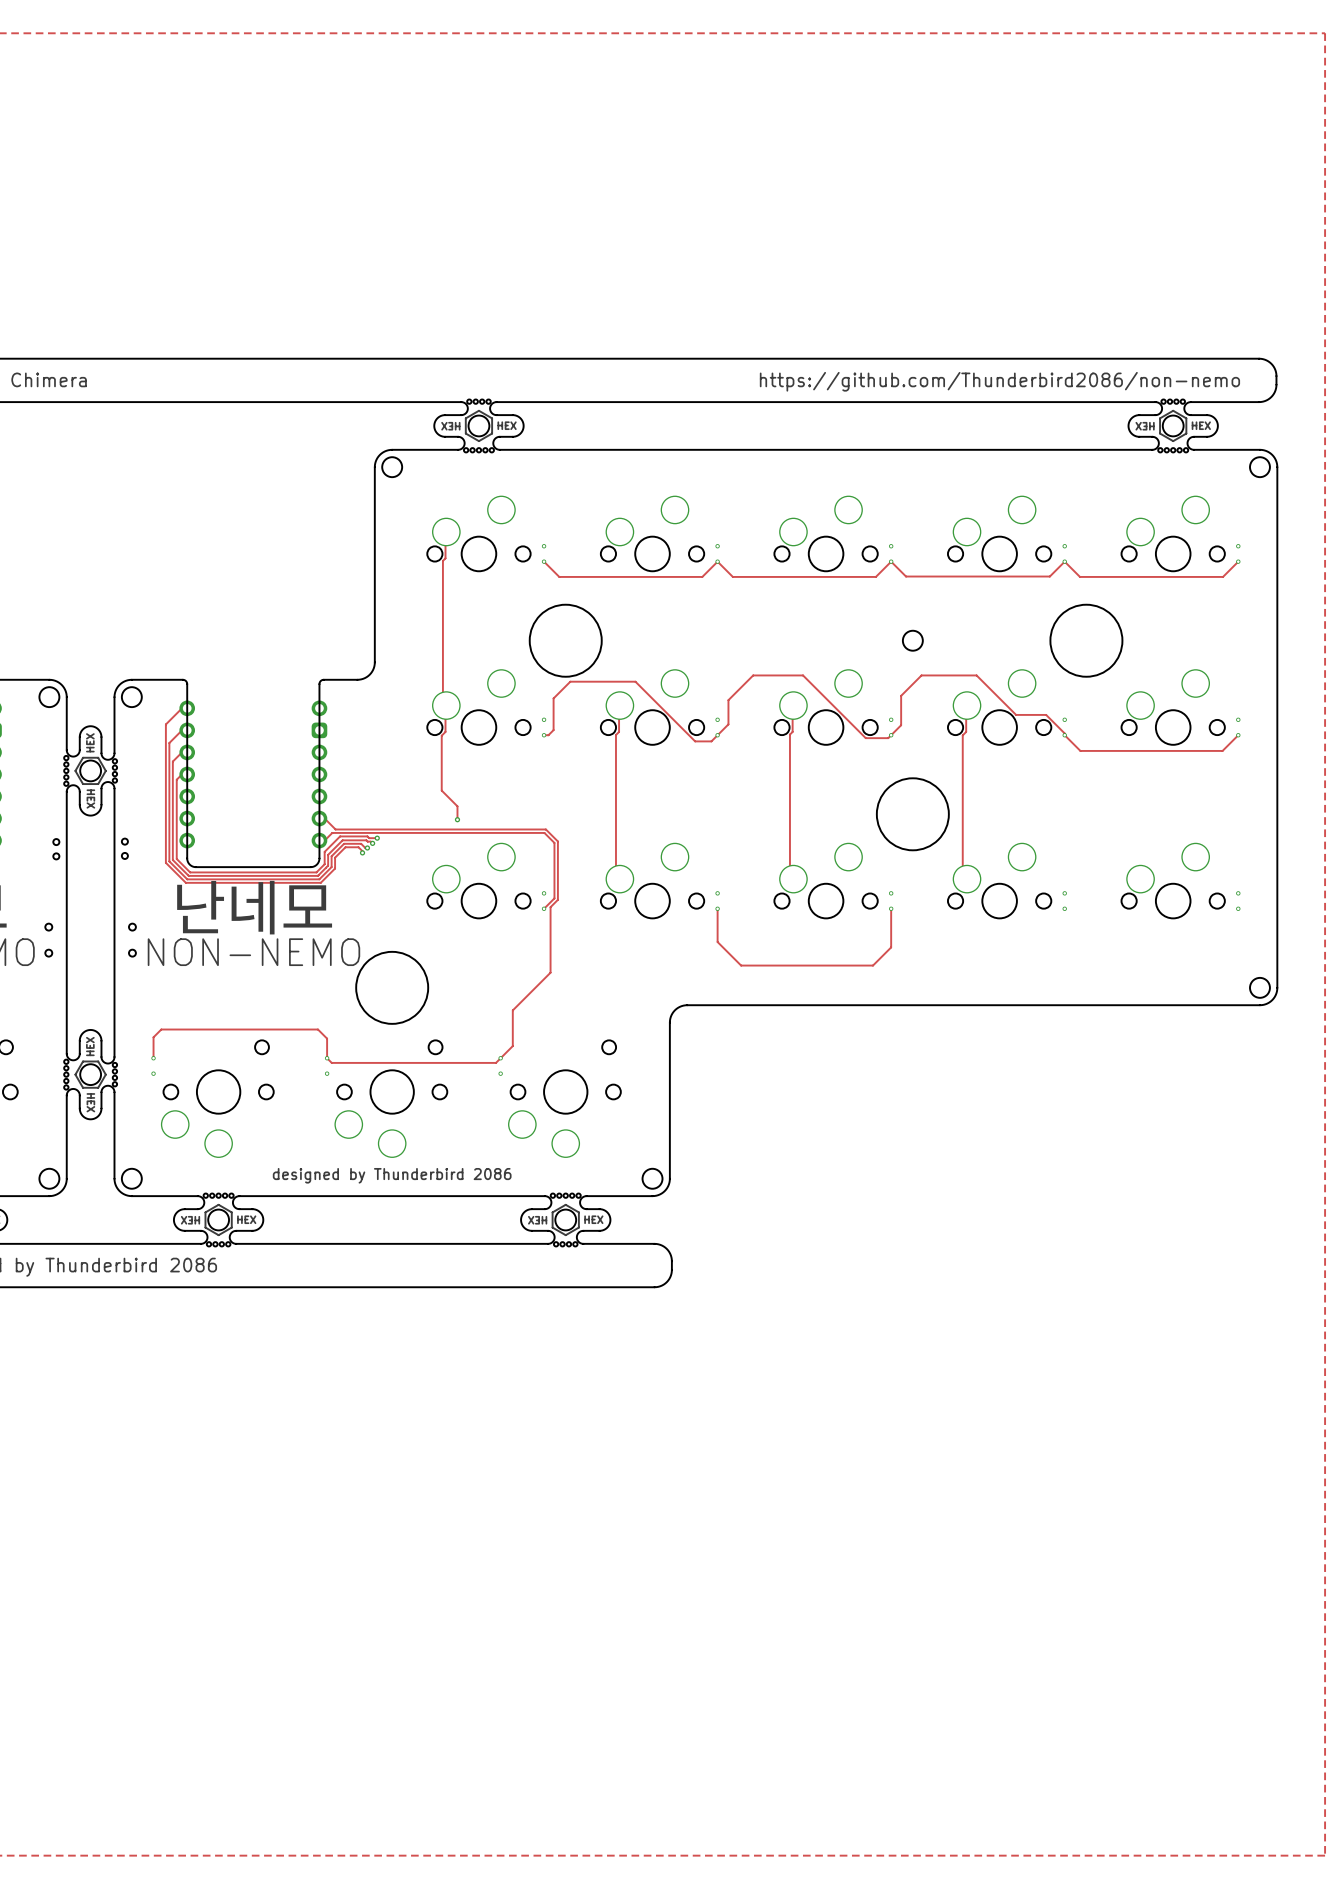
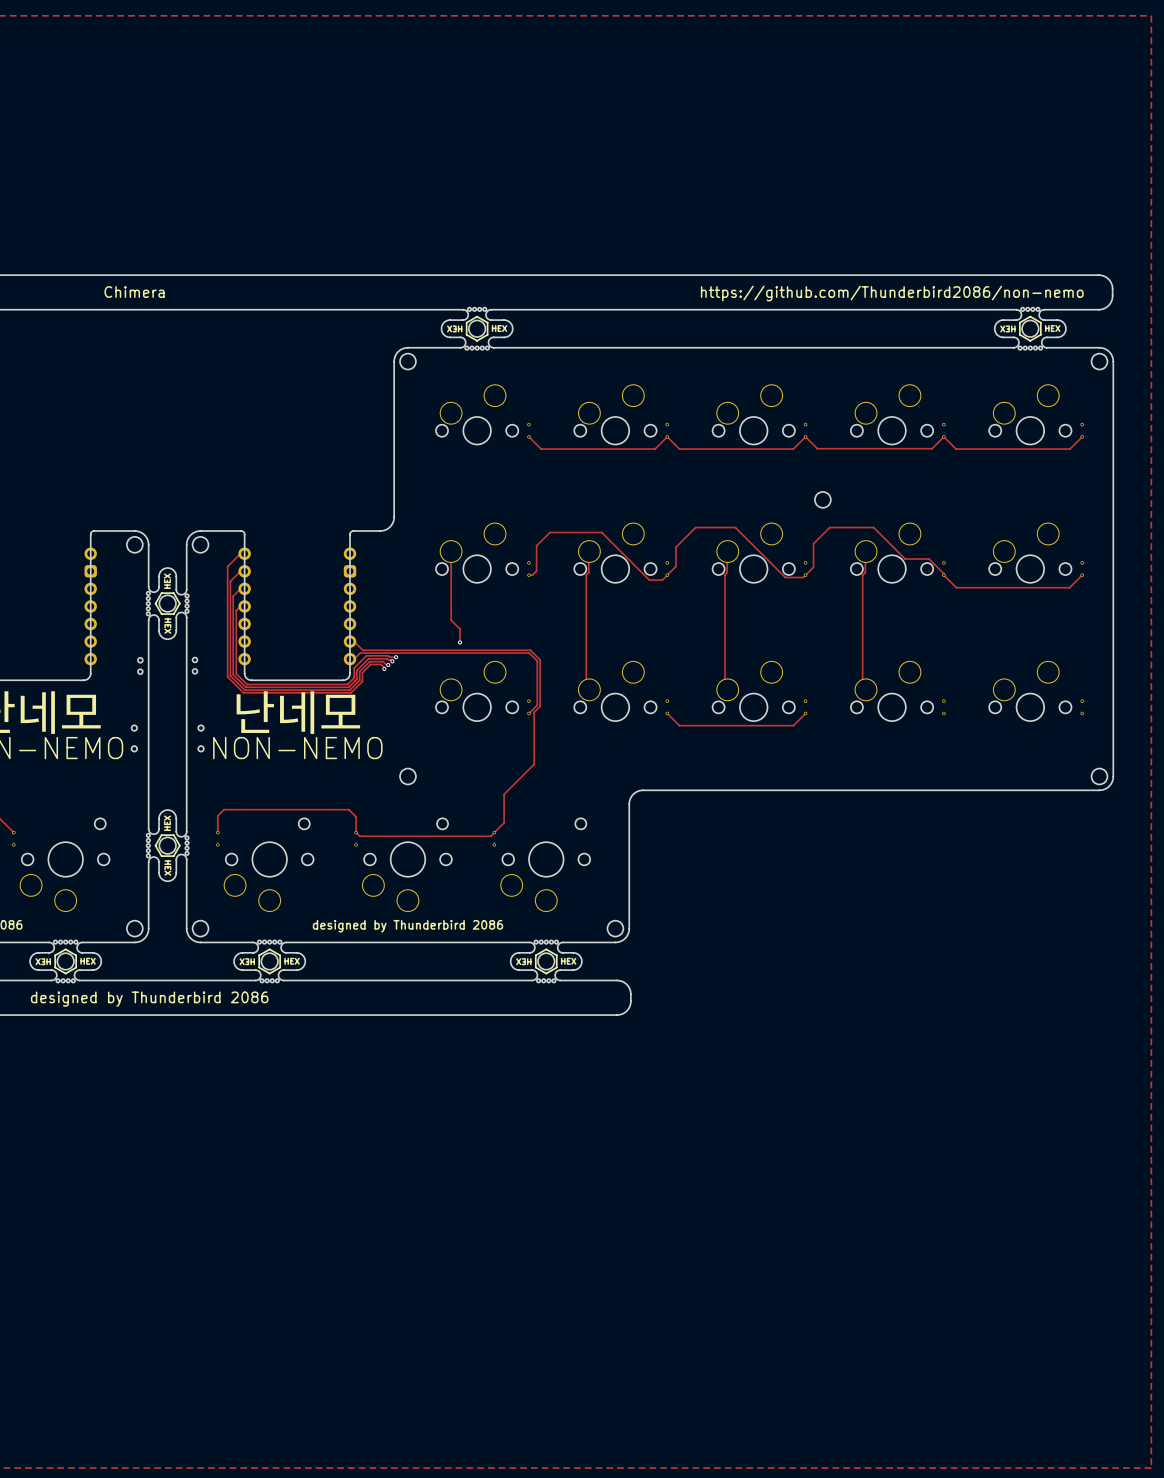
track: (446, 532) (445, 558) (442, 560) (442, 702) (446, 705) (445, 731) (441, 735) (441, 790) (457, 806) -> (451, 551) (451, 620) (460, 629) (460, 631)
round board edge: [529, 604, 603, 678] -> none
round board edge: [1049, 604, 1124, 678] -> none
round board edge: [876, 777, 950, 851] -> none
track: (717, 908) (717, 942) (741, 965) (873, 965) (891, 947) (891, 908) -> (667, 713) (679, 725) (793, 725) (805, 713)
round board edge size: [355, 951, 429, 1025] -> [399, 768, 417, 785]

